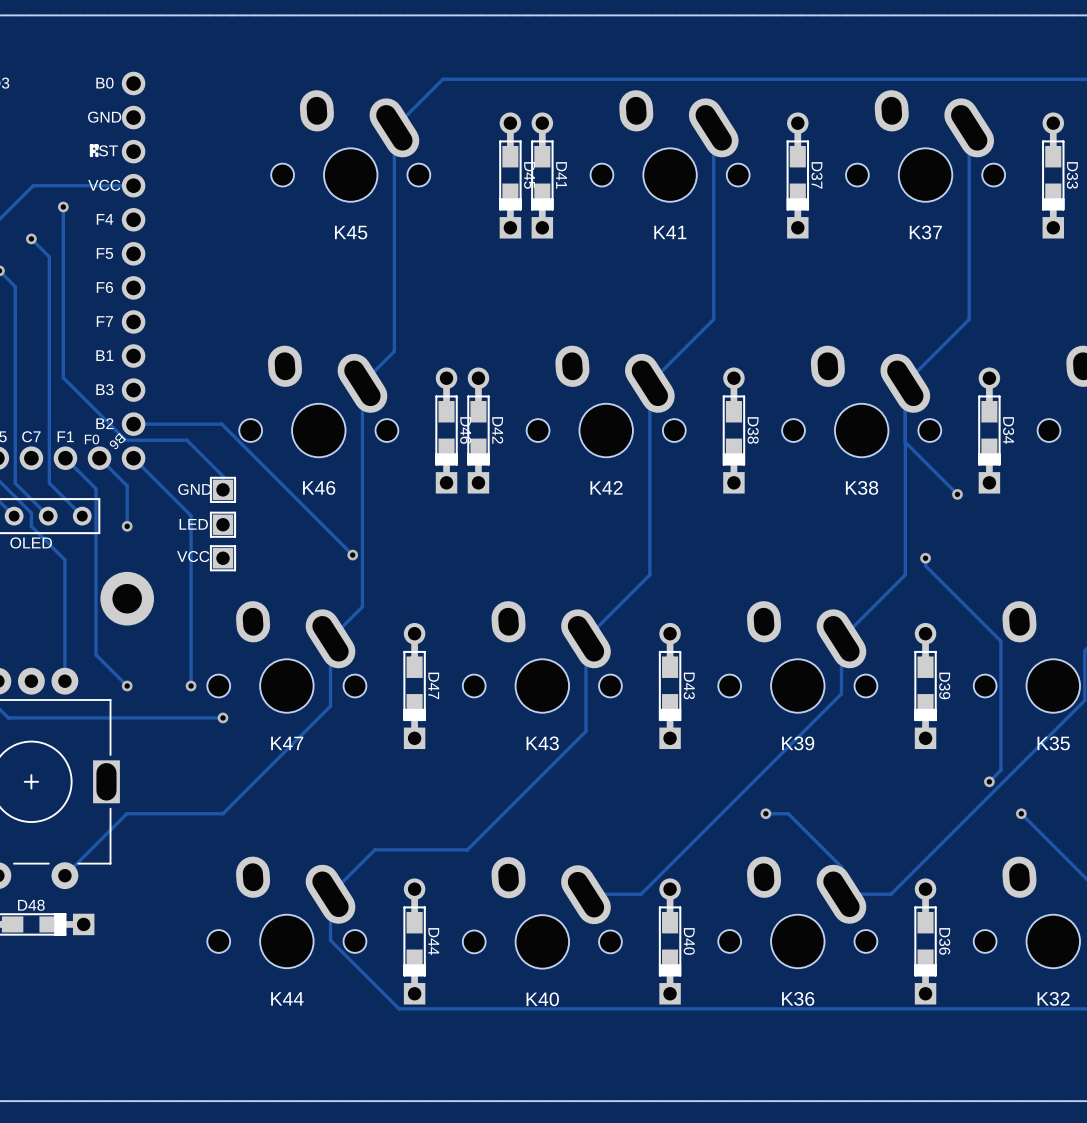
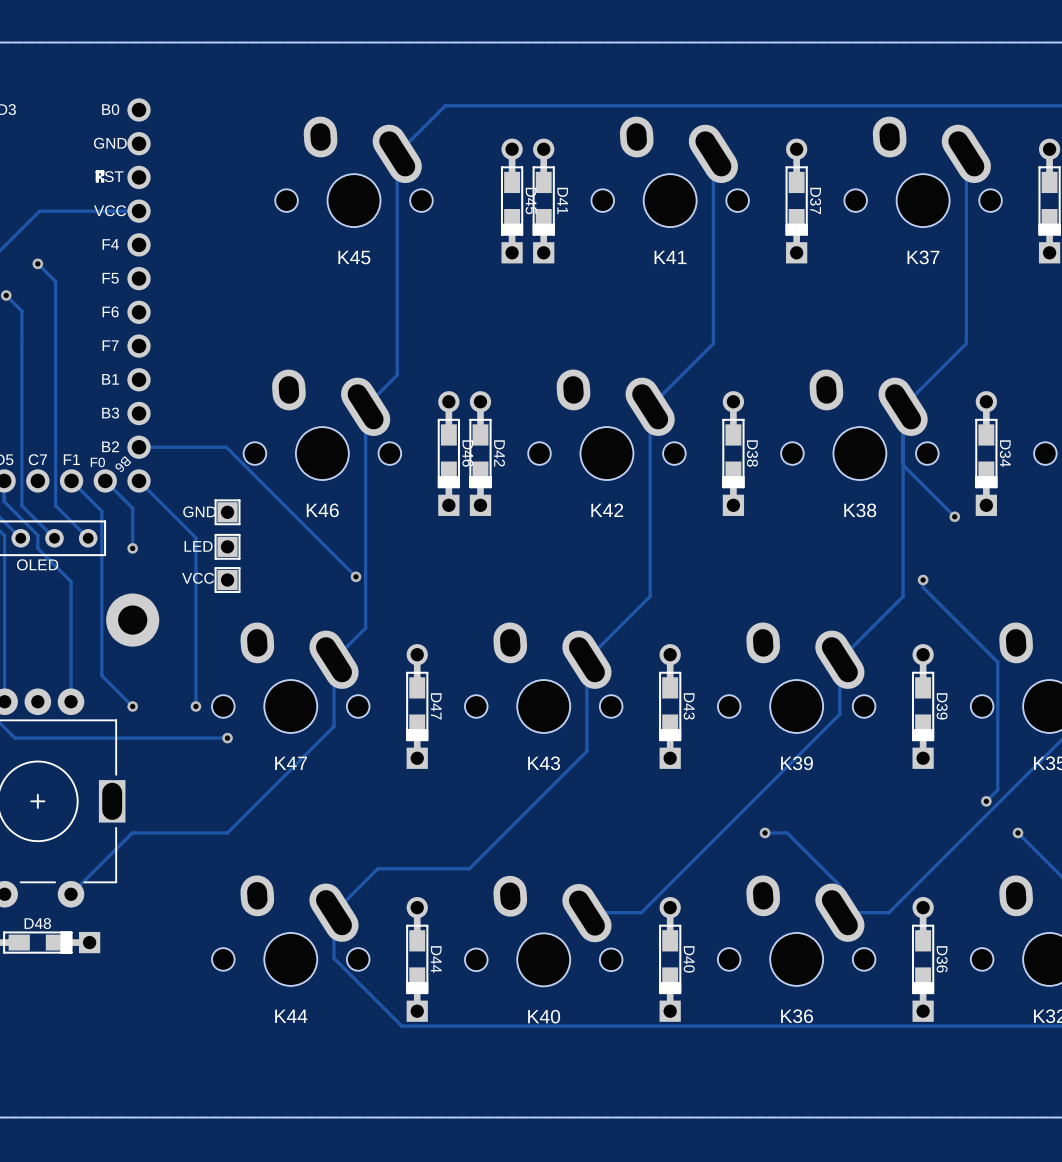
track: (63, 206) (63, 377) (125, 440) (186, 440) (222, 476) (222, 489) -> none
via: (63, 206) -> none

